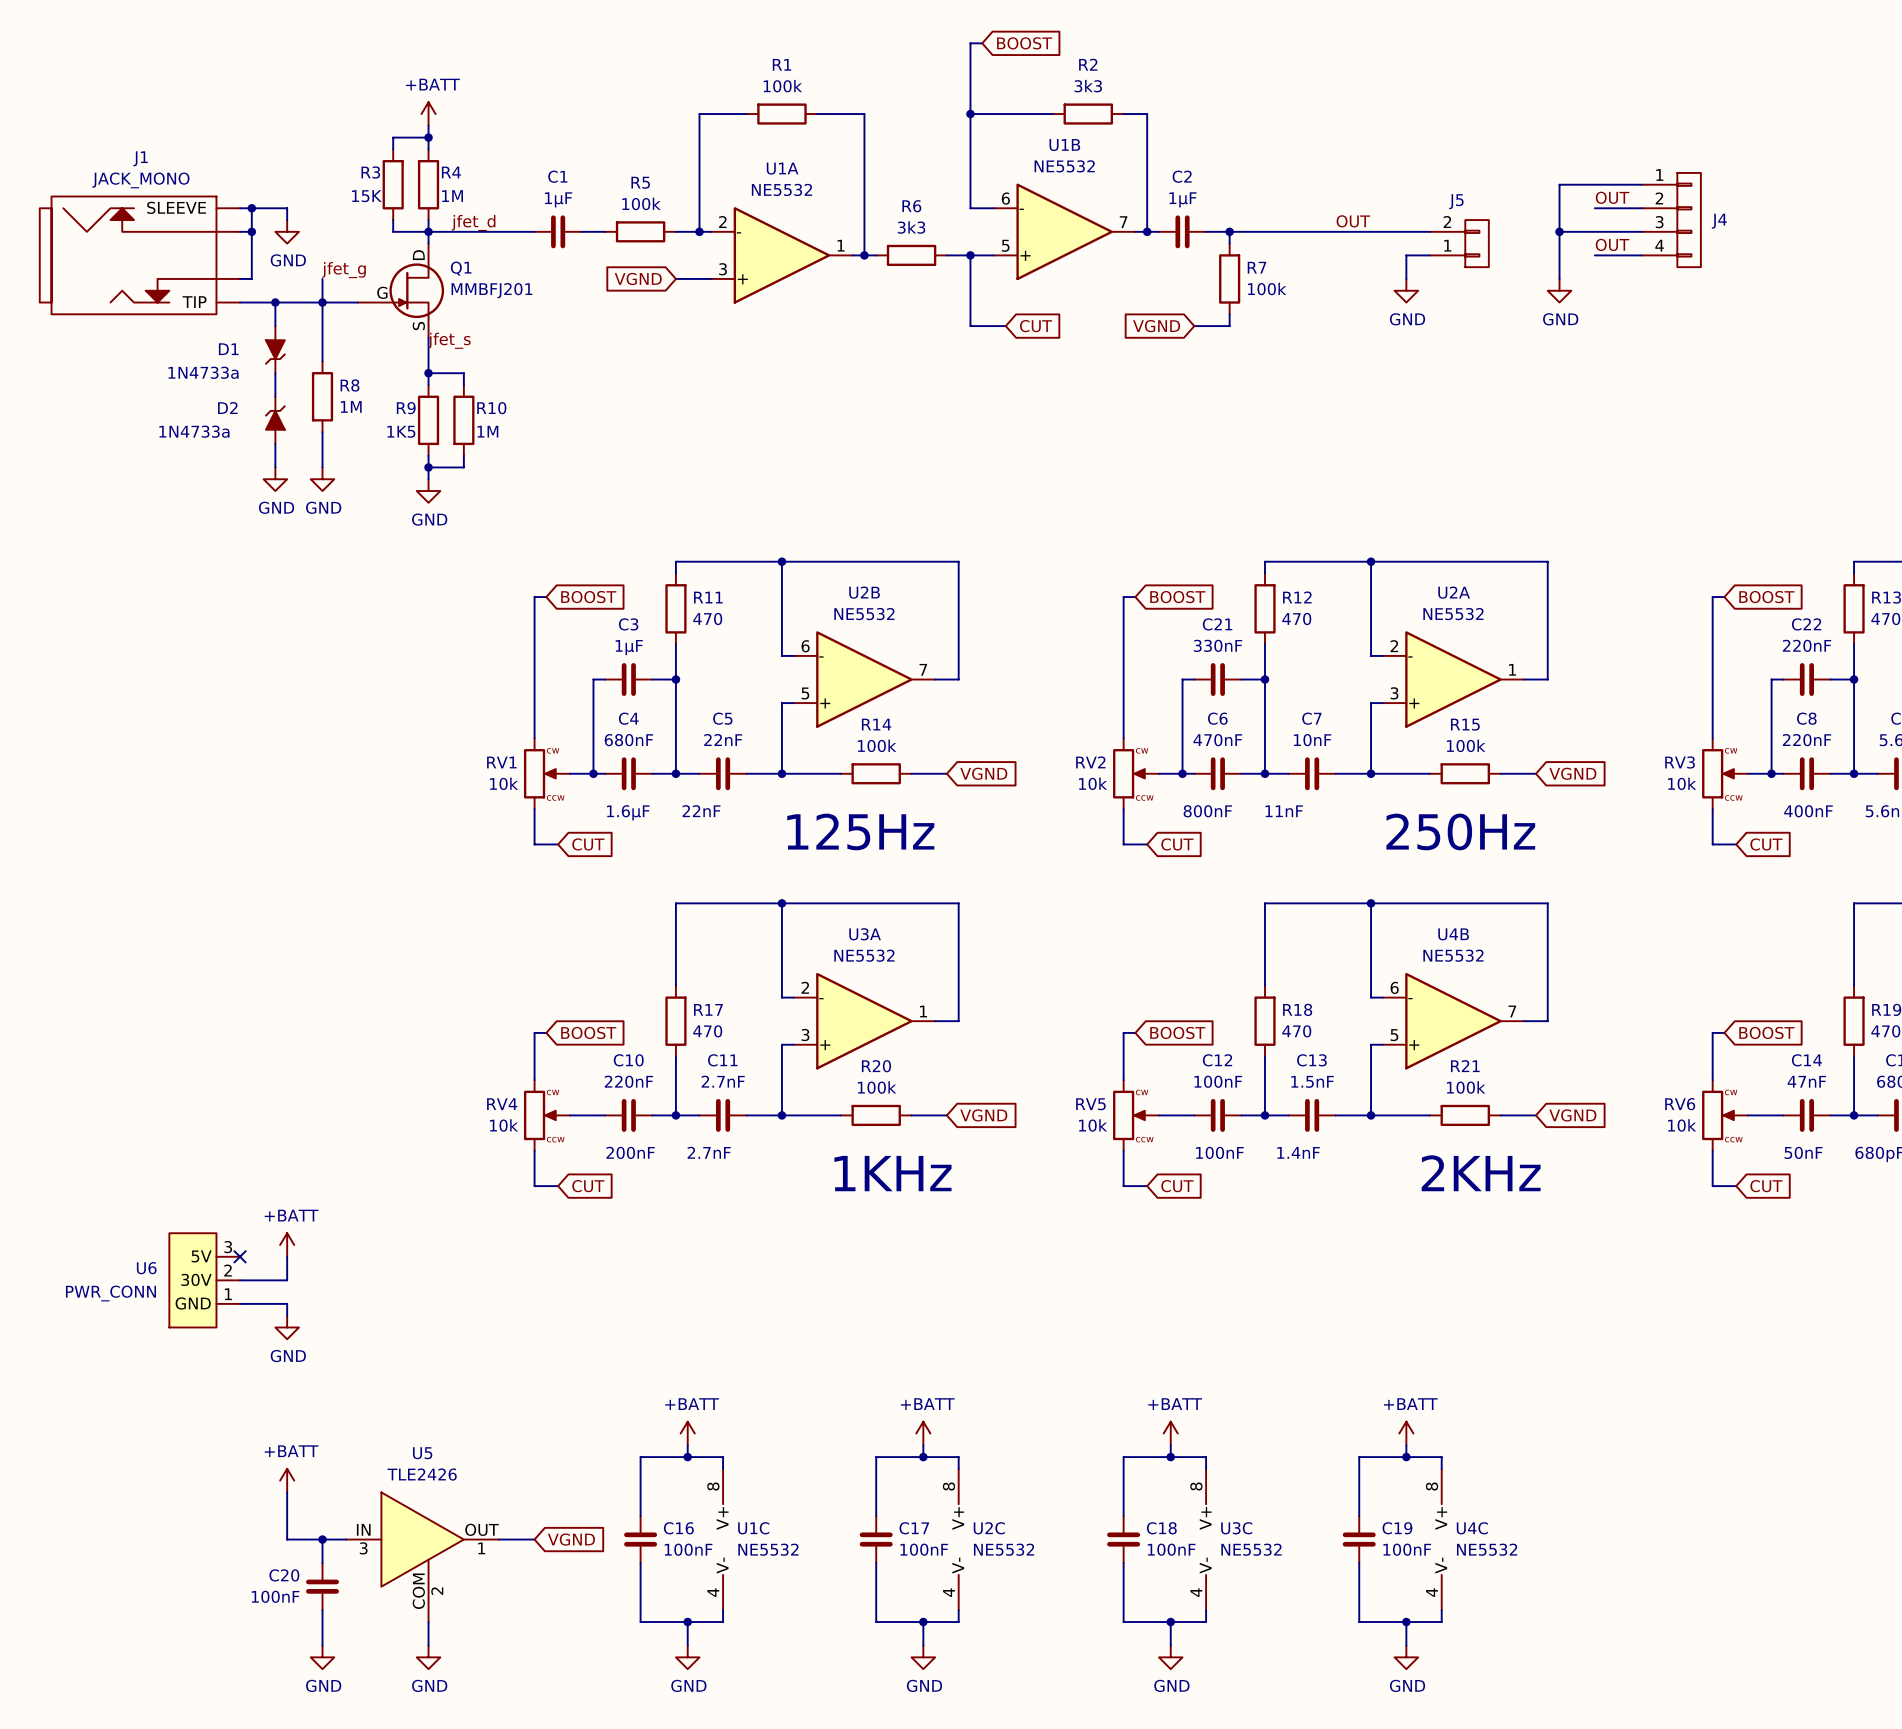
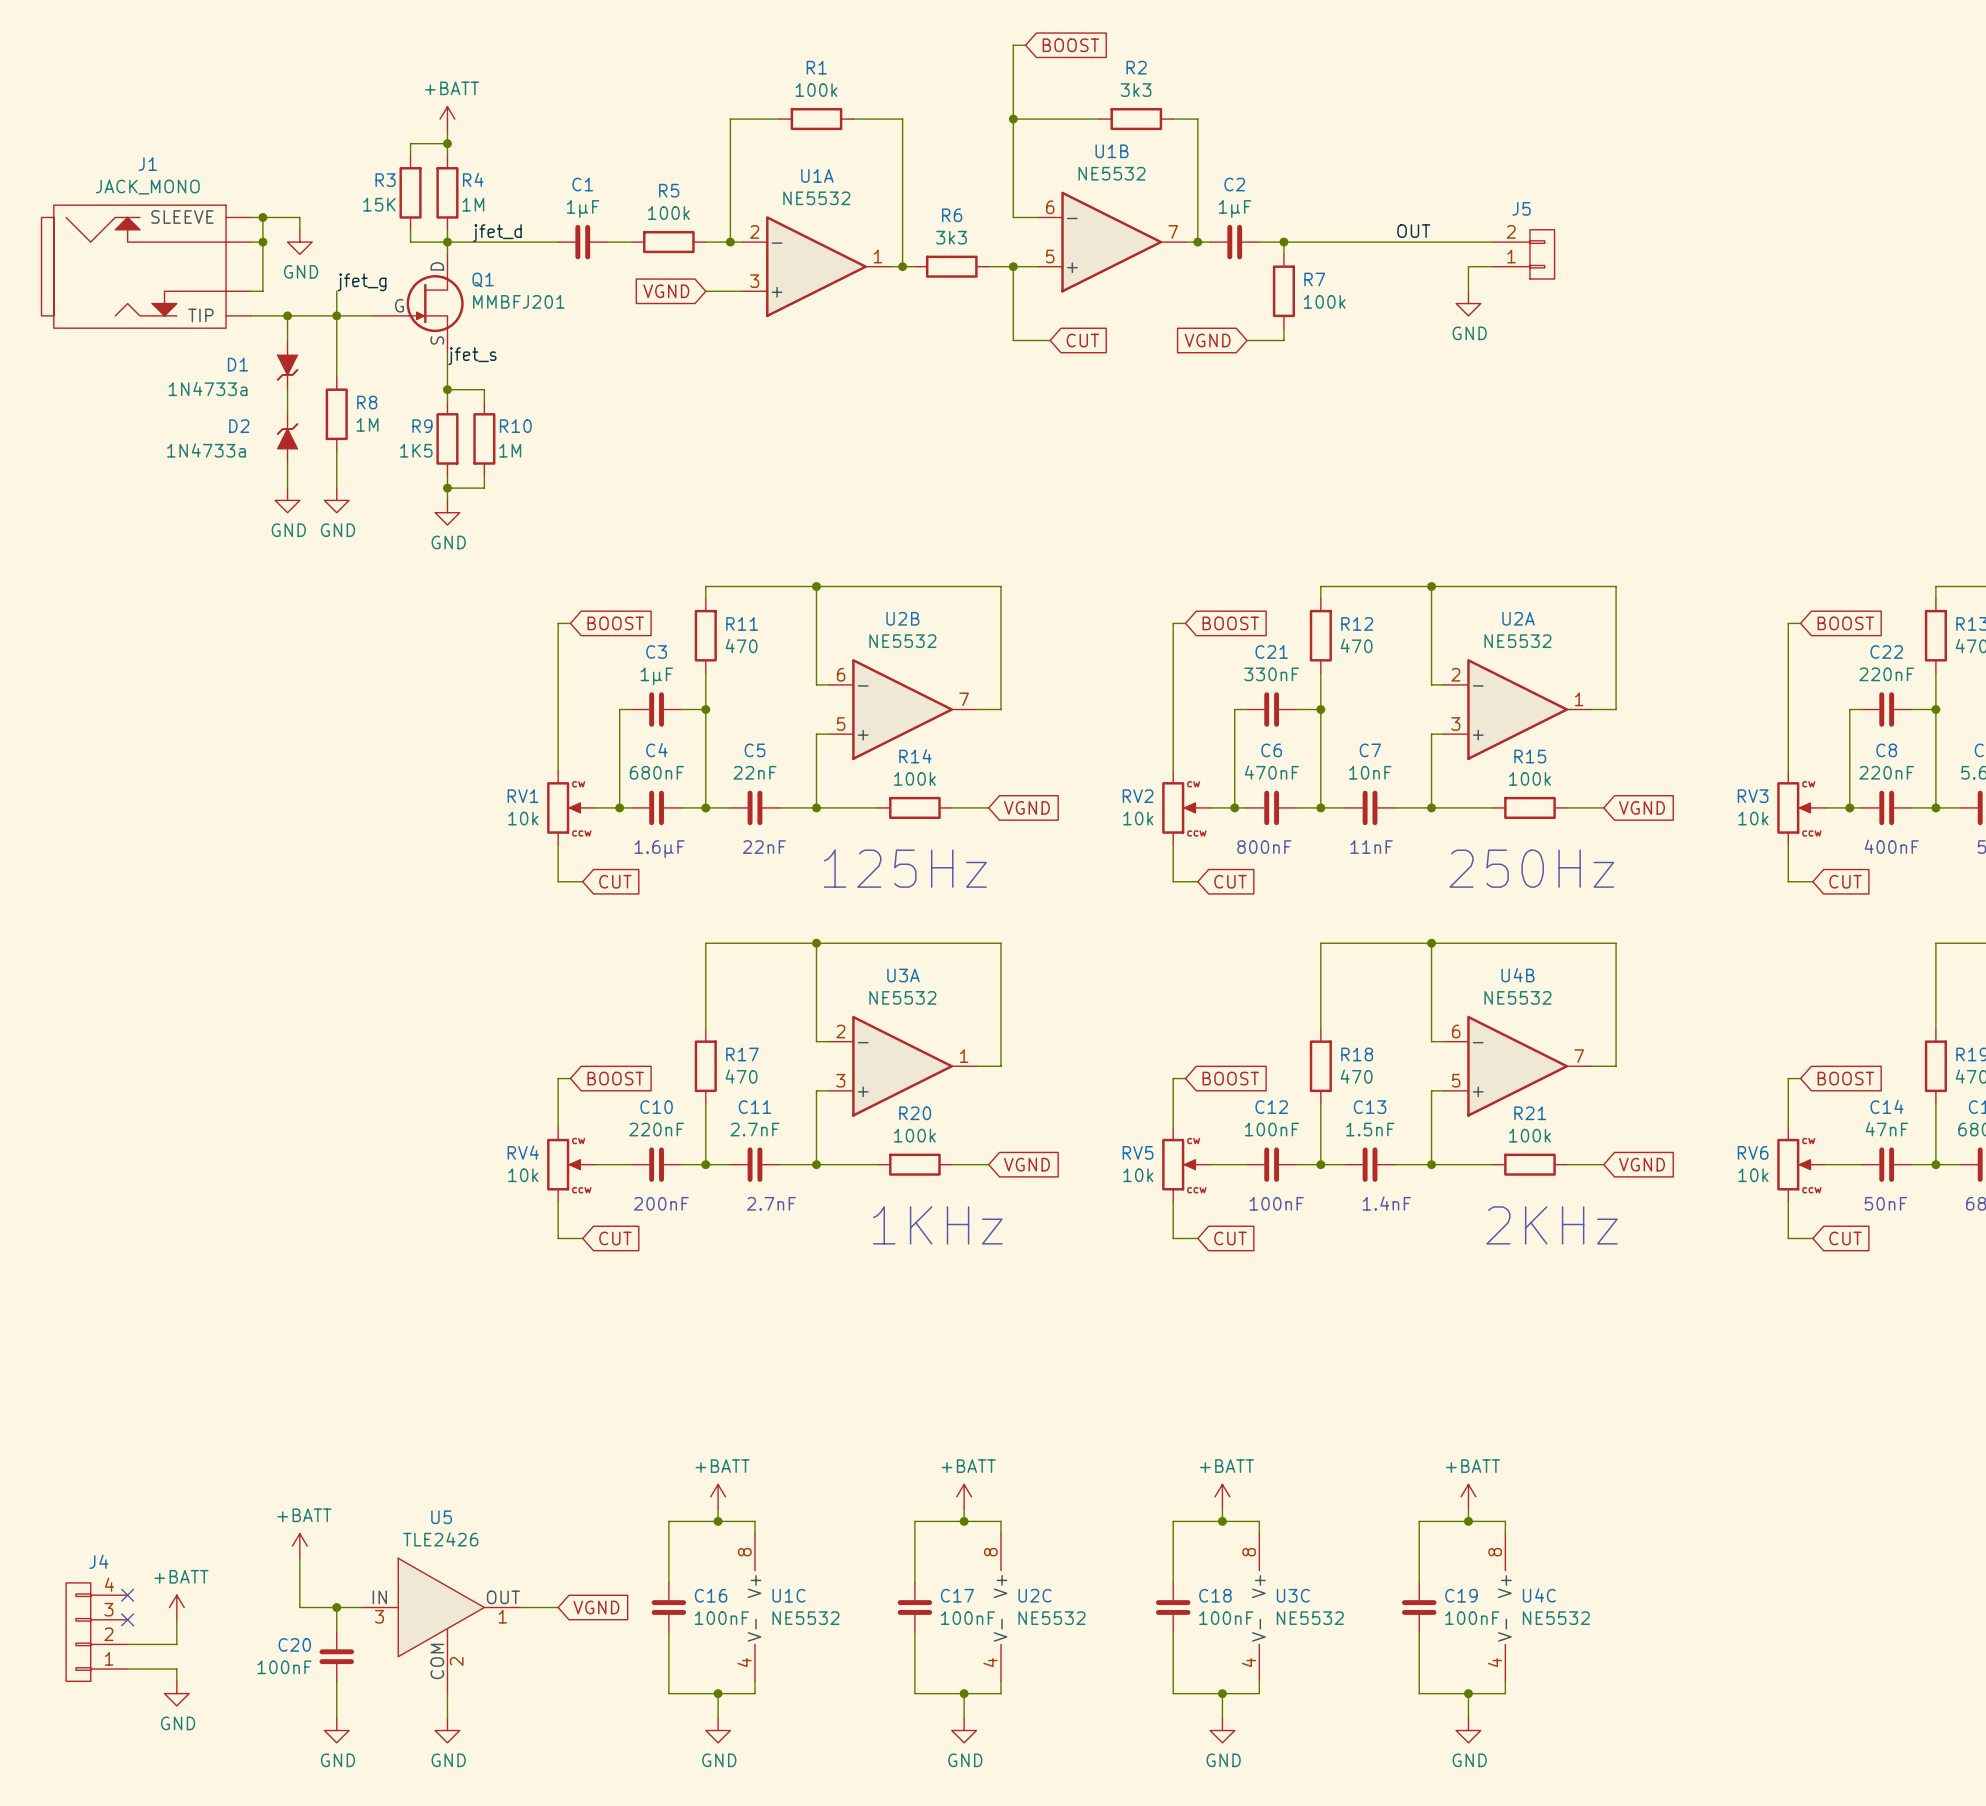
wire: (1641, 184) (1559, 184) (1559, 278) -> none
label: OUT (1612, 197) -> none
wire: (1594, 208) (1641, 208) -> none
J4 position: (1671, 220) -> (96, 1632)
J4 rotation: 0° (1689, 220) -> 180° (78, 1632)
J4 name position: J4 (1719, 221) -> J4 (98, 1561)
wire: (1559, 231) (1641, 231) -> none
junction: (1559, 231) -> none
label: OUT (1612, 244) -> none
wire: (1594, 255) (1641, 255) -> none
power symbol: GND (1559, 290) -> none
power symbol: +BATT (287, 1245) -> none
no-connect mark: (240, 1256) -> none
wire: (287, 1256) (287, 1280) (240, 1280) -> none
U6: PWR_CONN (204, 1280) -> none
wire: (240, 1303) (287, 1303) (287, 1315) -> none
power symbol: GND (287, 1327) -> none
no-connect mark: none -> (127, 1595)
power symbol: none -> +BATT (176, 1607)
no-connect mark: none -> (127, 1619)
wire: none -> (176, 1619) (176, 1644) (127, 1644)
wire: none -> (127, 1669) (176, 1669) (176, 1681)
power symbol: none -> GND (176, 1693)

